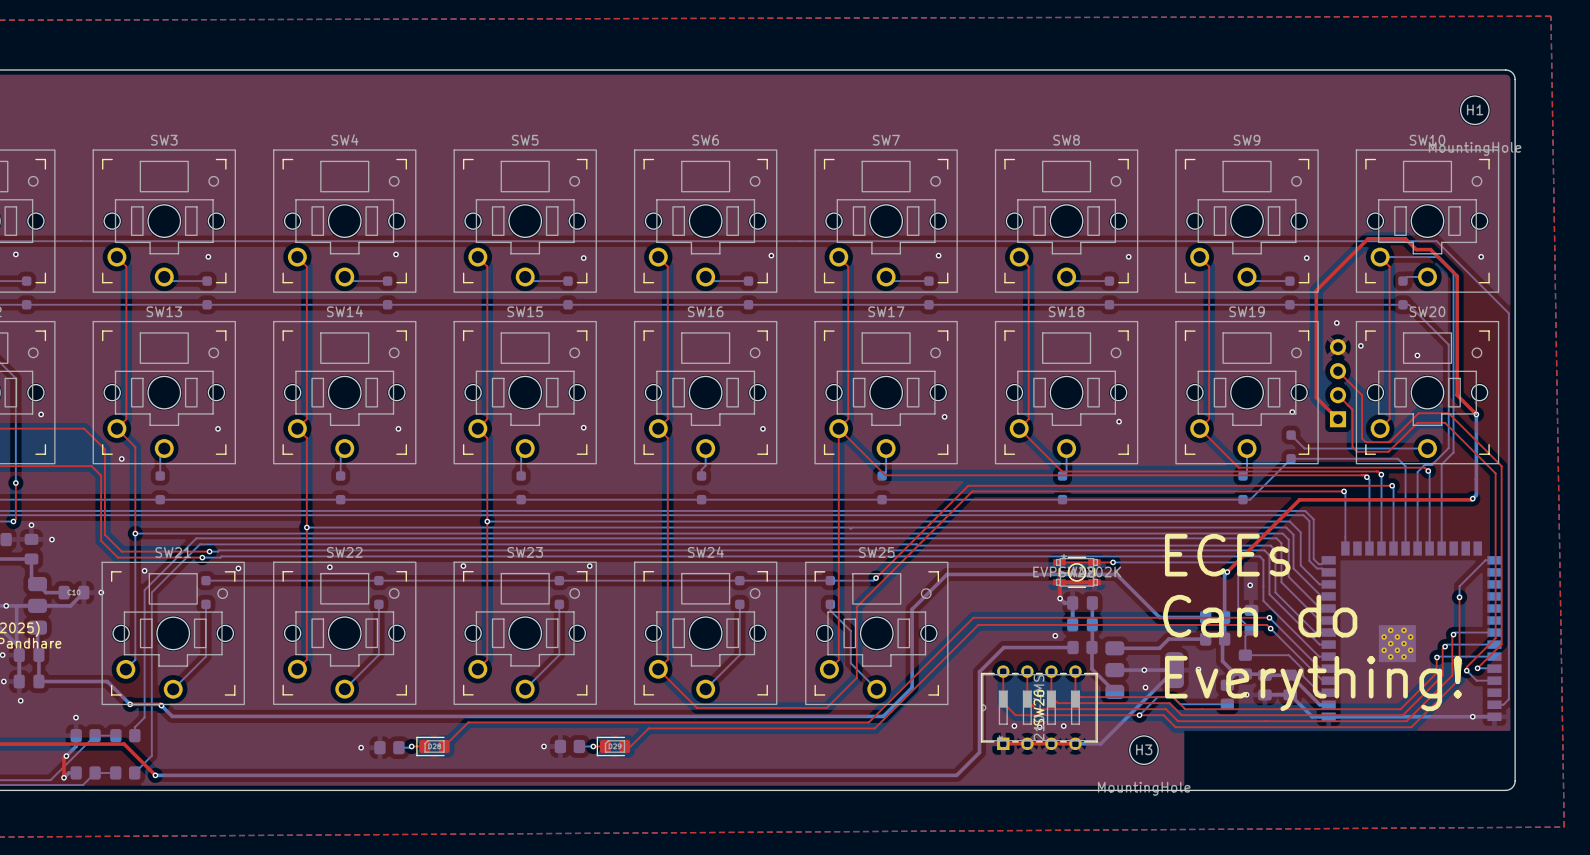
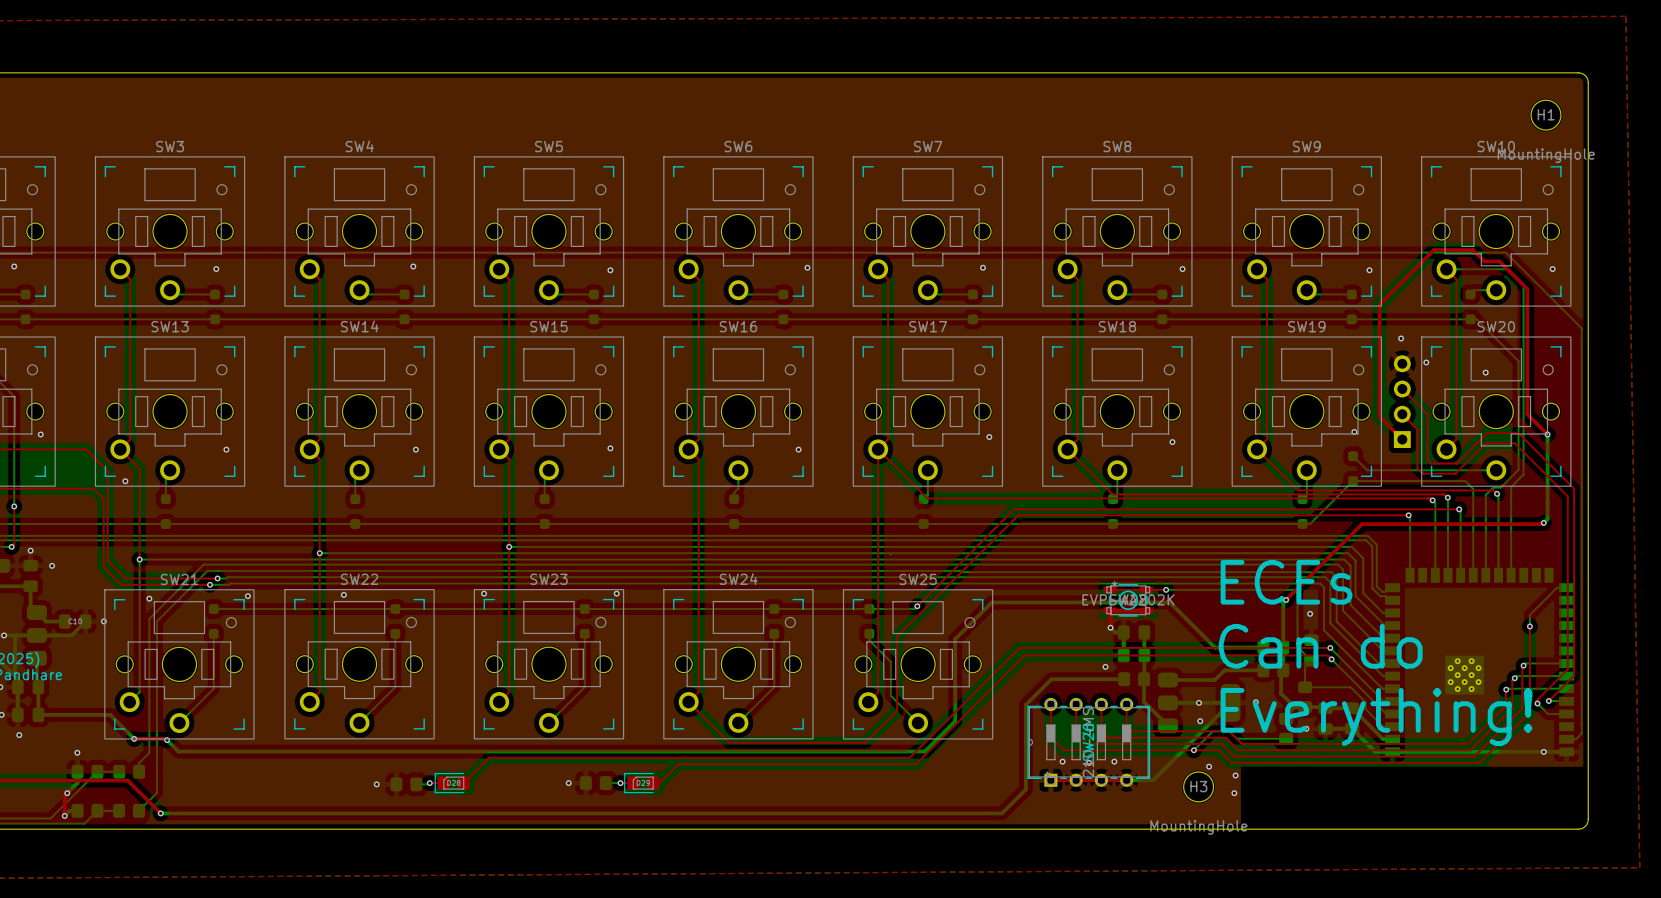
via: none -> (1209, 766)
via: none -> (1235, 775)
via: none -> (1234, 793)

